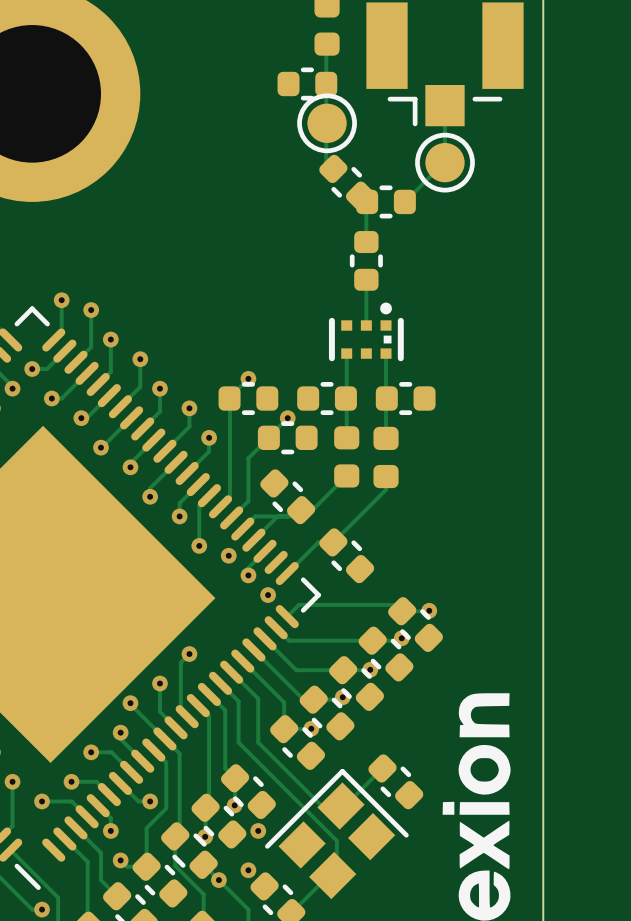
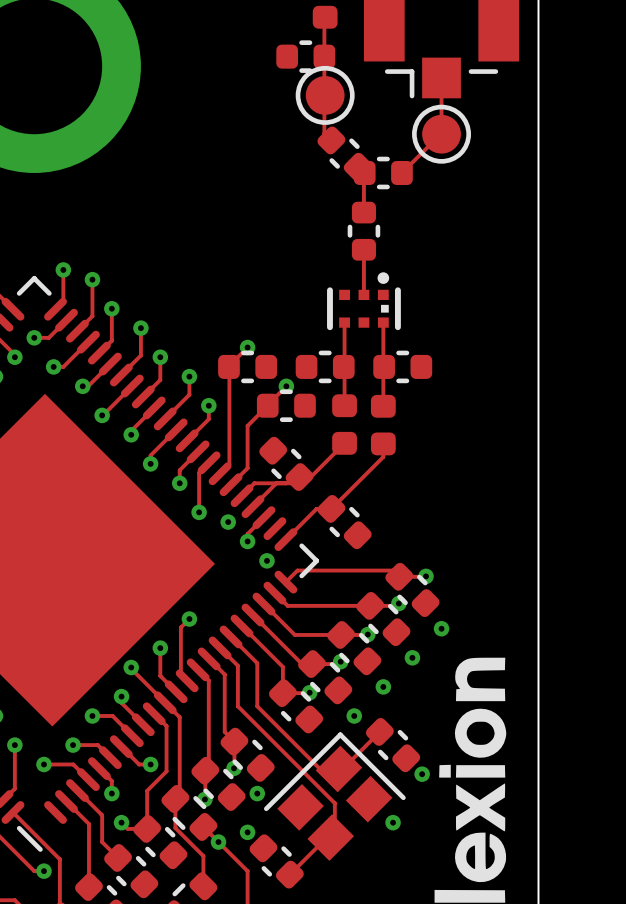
via: none -> (441, 628)
via: none -> (412, 657)
via: none -> (383, 686)
via: none -> (354, 716)
via: none -> (422, 774)
via: none -> (393, 822)

